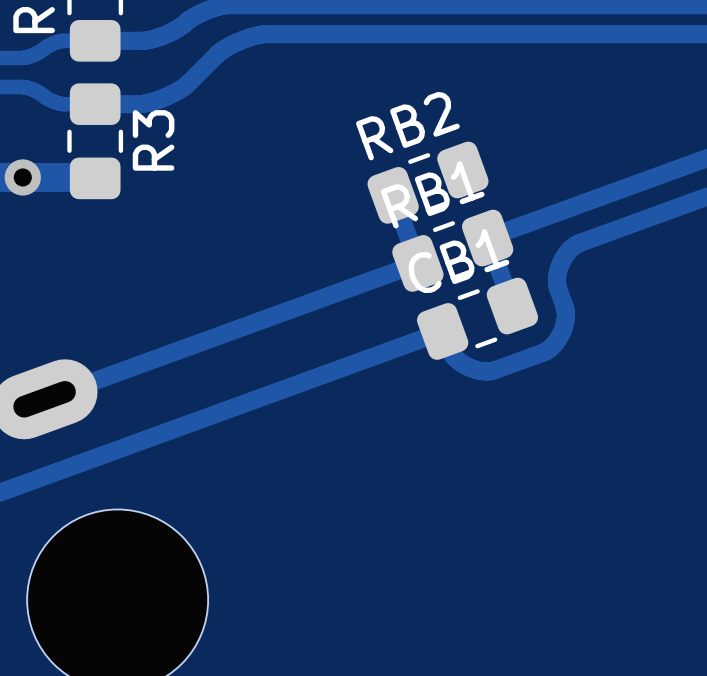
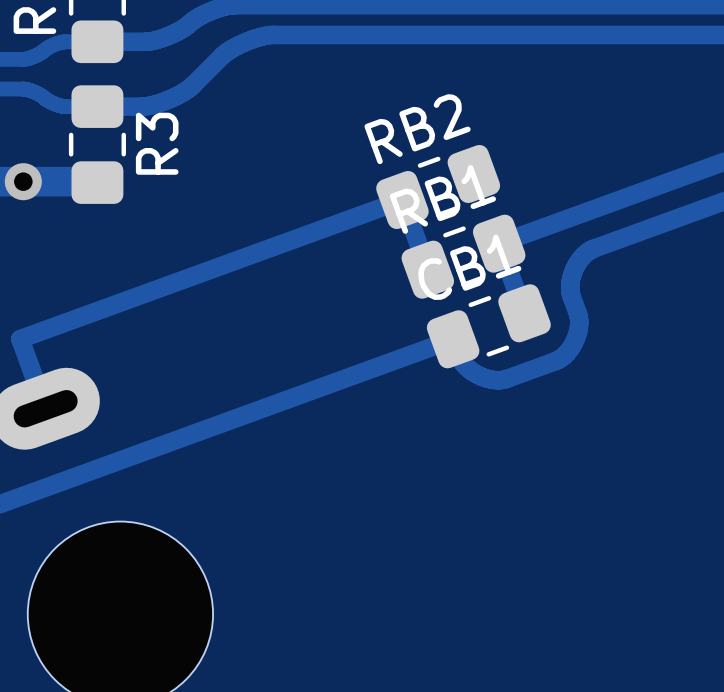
track: (417, 263) (44, 399) -> (402, 200) (20, 339) (45, 408)

